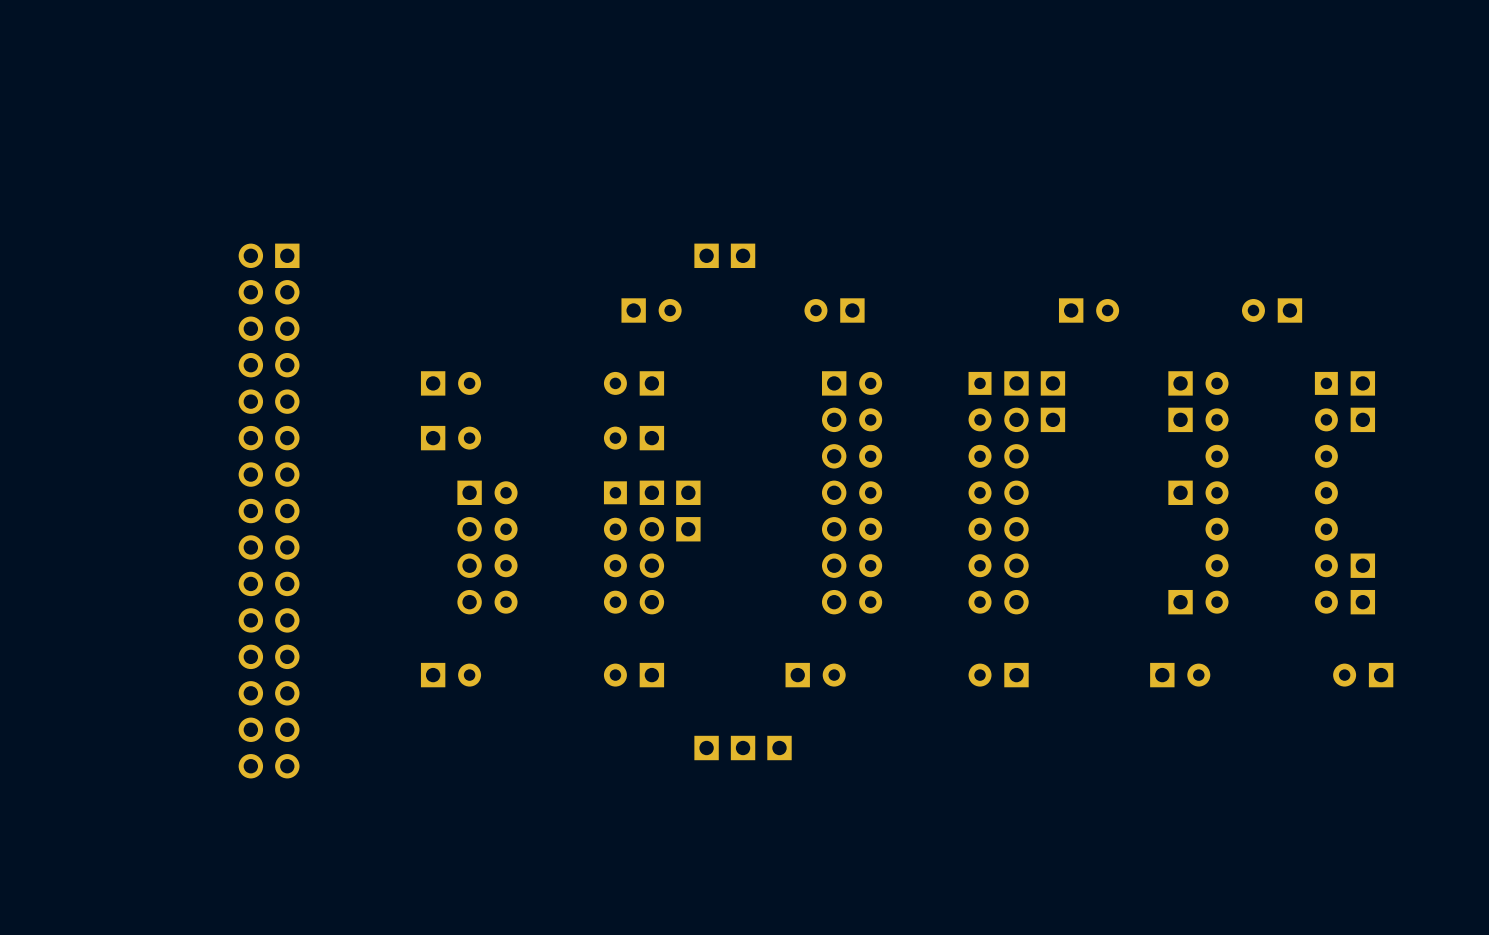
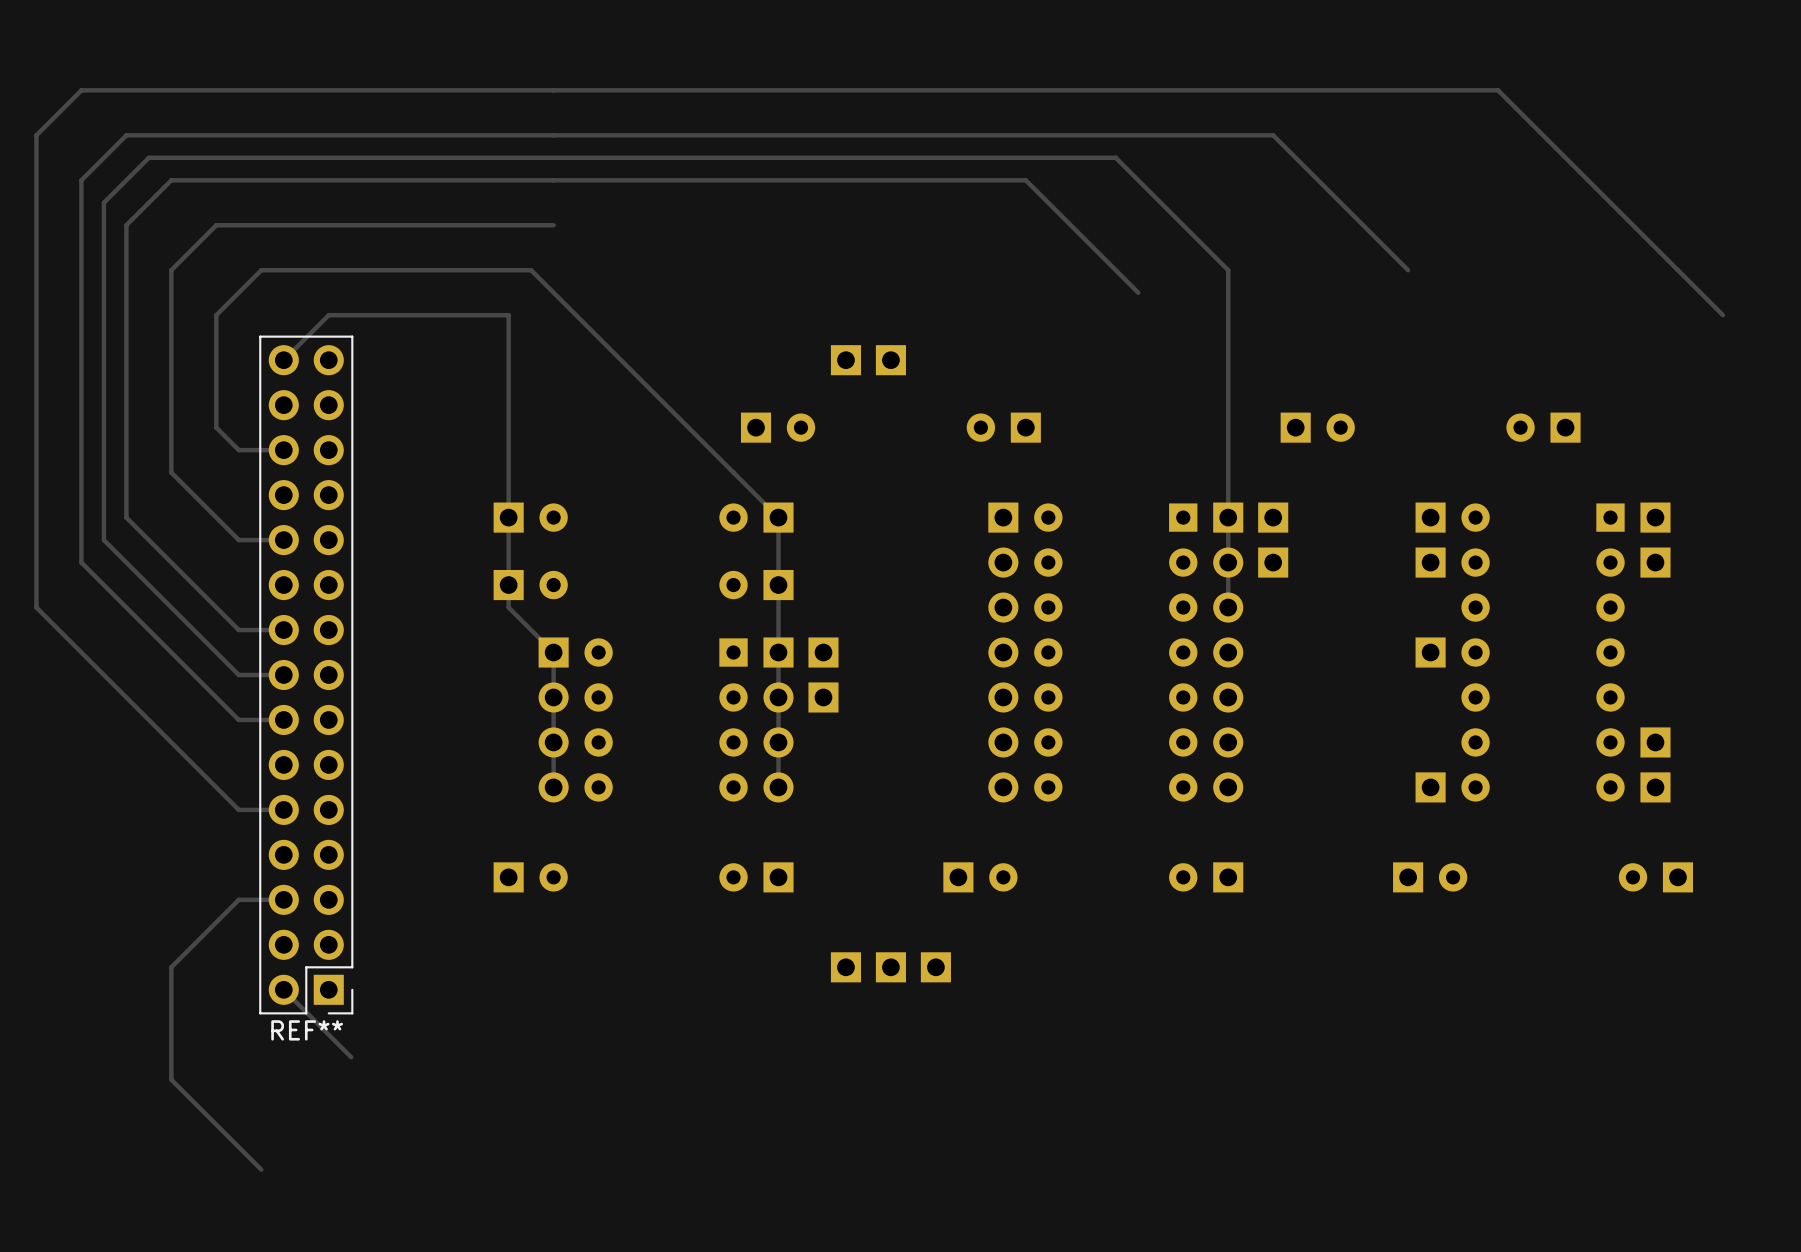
track: none -> (553, 225) (216, 225) (171, 270) (171, 472) (238, 540) (283, 540)
track: none -> (1408, 270) (1273, 135) (126, 135) (81, 180) (81, 562) (238, 719) (283, 719)
track: none -> (1138, 292) (1025, 180) (171, 180) (126, 225) (126, 517) (238, 630) (283, 630)
track: none -> (1722, 315) (1498, 90) (81, 90) (36, 135) (36, 607) (238, 809) (283, 809)
track: none -> (283, 360) (328, 315) (508, 315) (508, 607) (553, 652) (553, 787)
track: none -> (283, 450) (238, 450) (216, 427) (216, 315) (261, 270) (531, 270) (778, 517) (778, 787)
track: none -> (1228, 607) (1228, 270) (1115, 157) (148, 157) (103, 202) (103, 540) (238, 674) (283, 674)
REF** side: top (269, 511) -> bottom (306, 674)
track: none -> (283, 899) (238, 899) (171, 967) (171, 1079) (261, 1169)
track: none -> (283, 989) (351, 1057)

